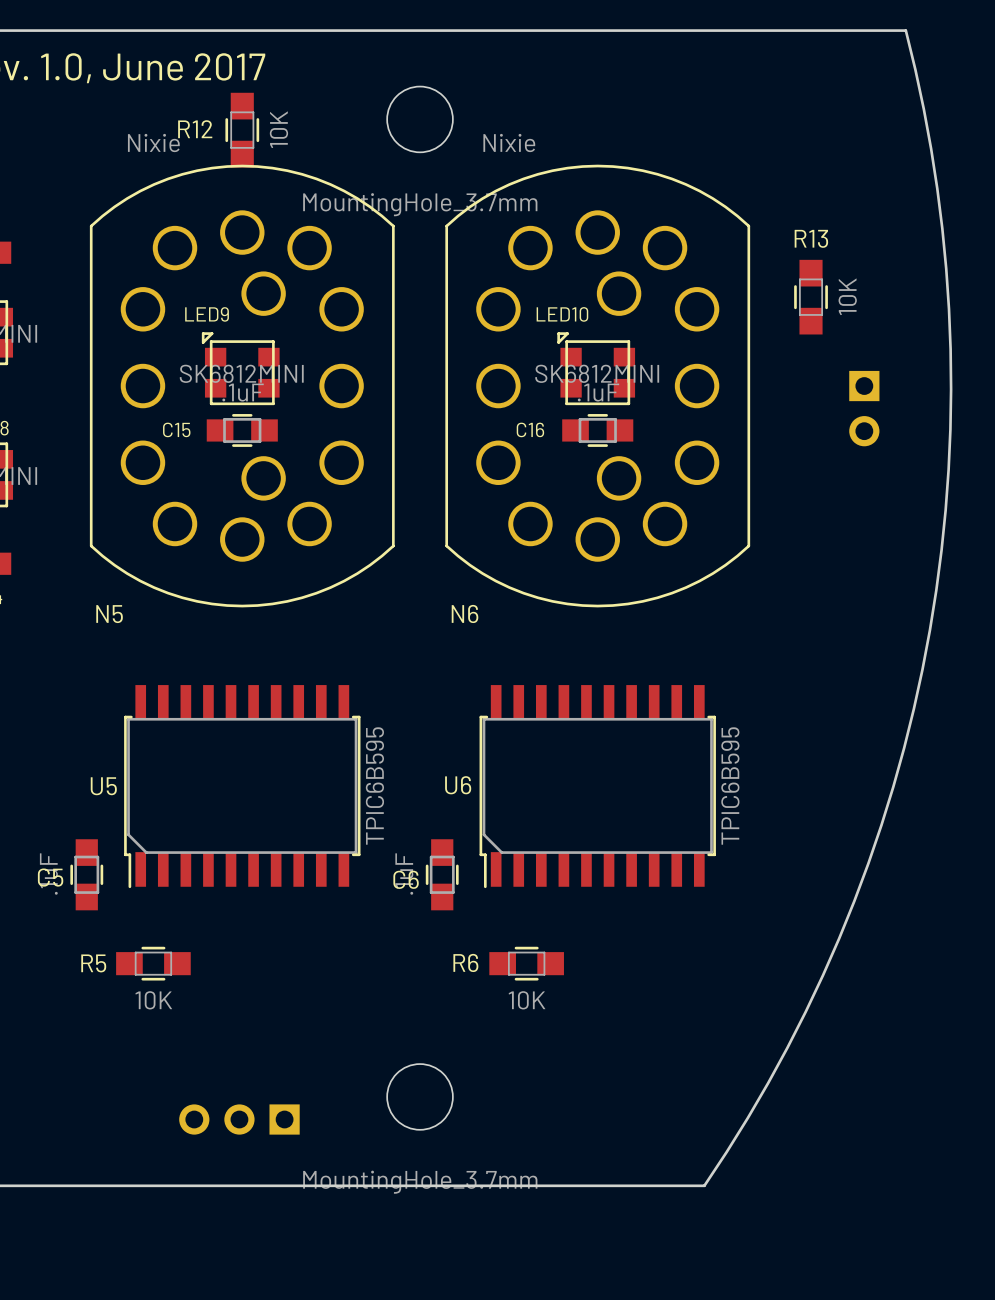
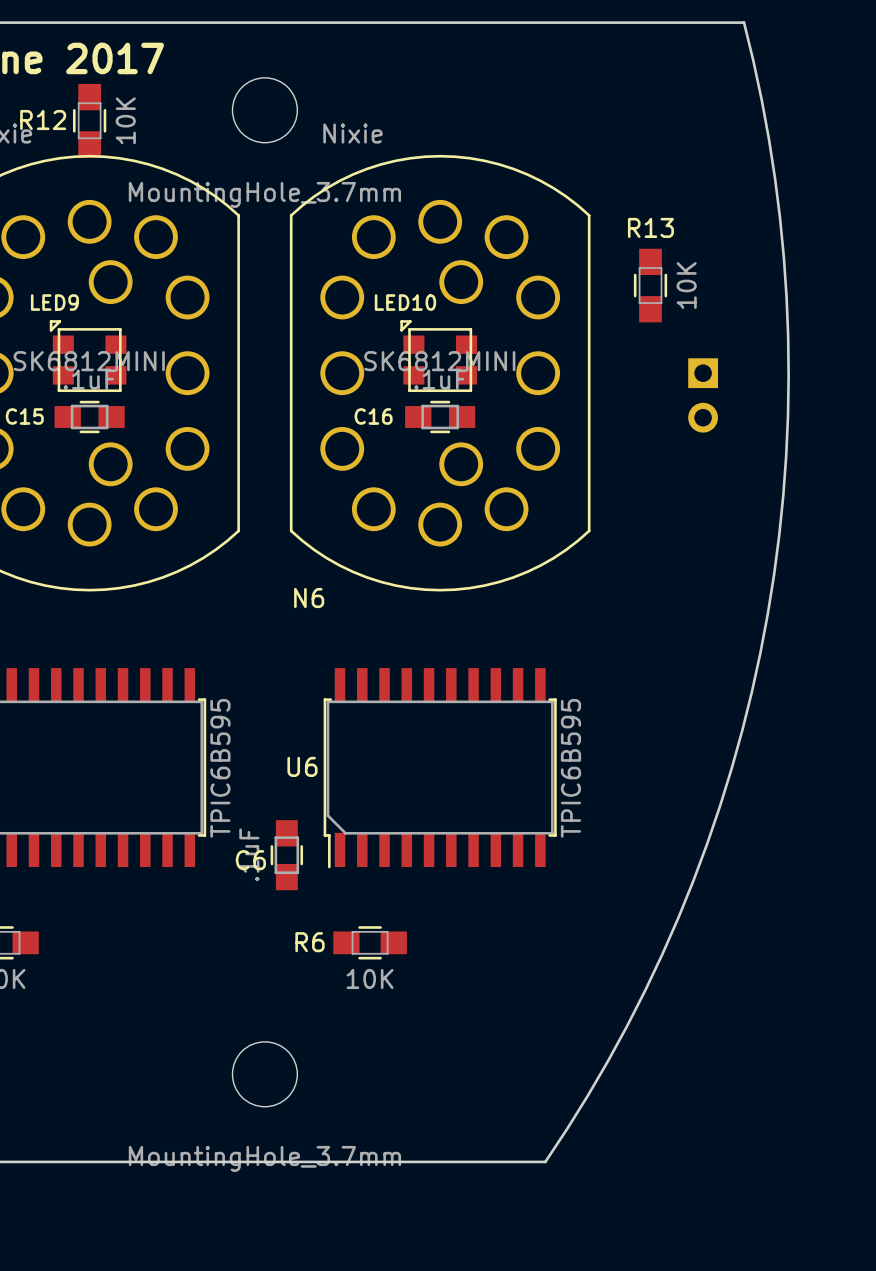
part: (239, 1119) -> none

